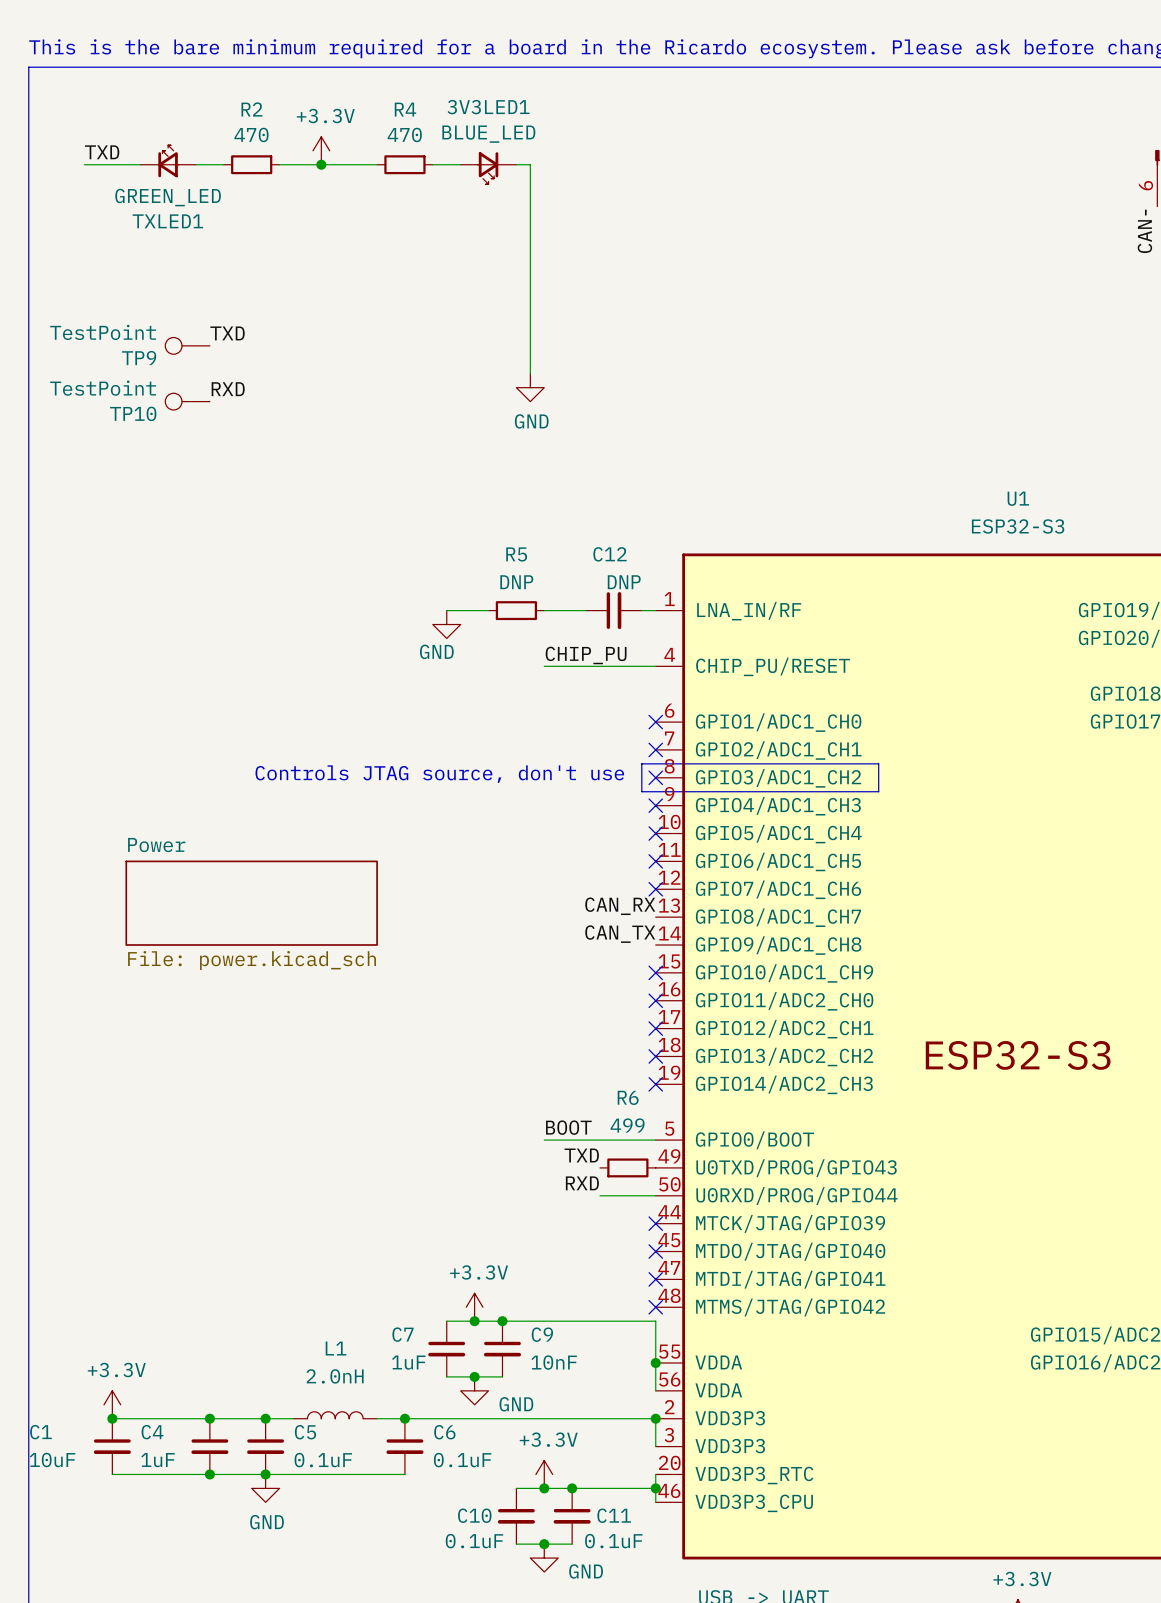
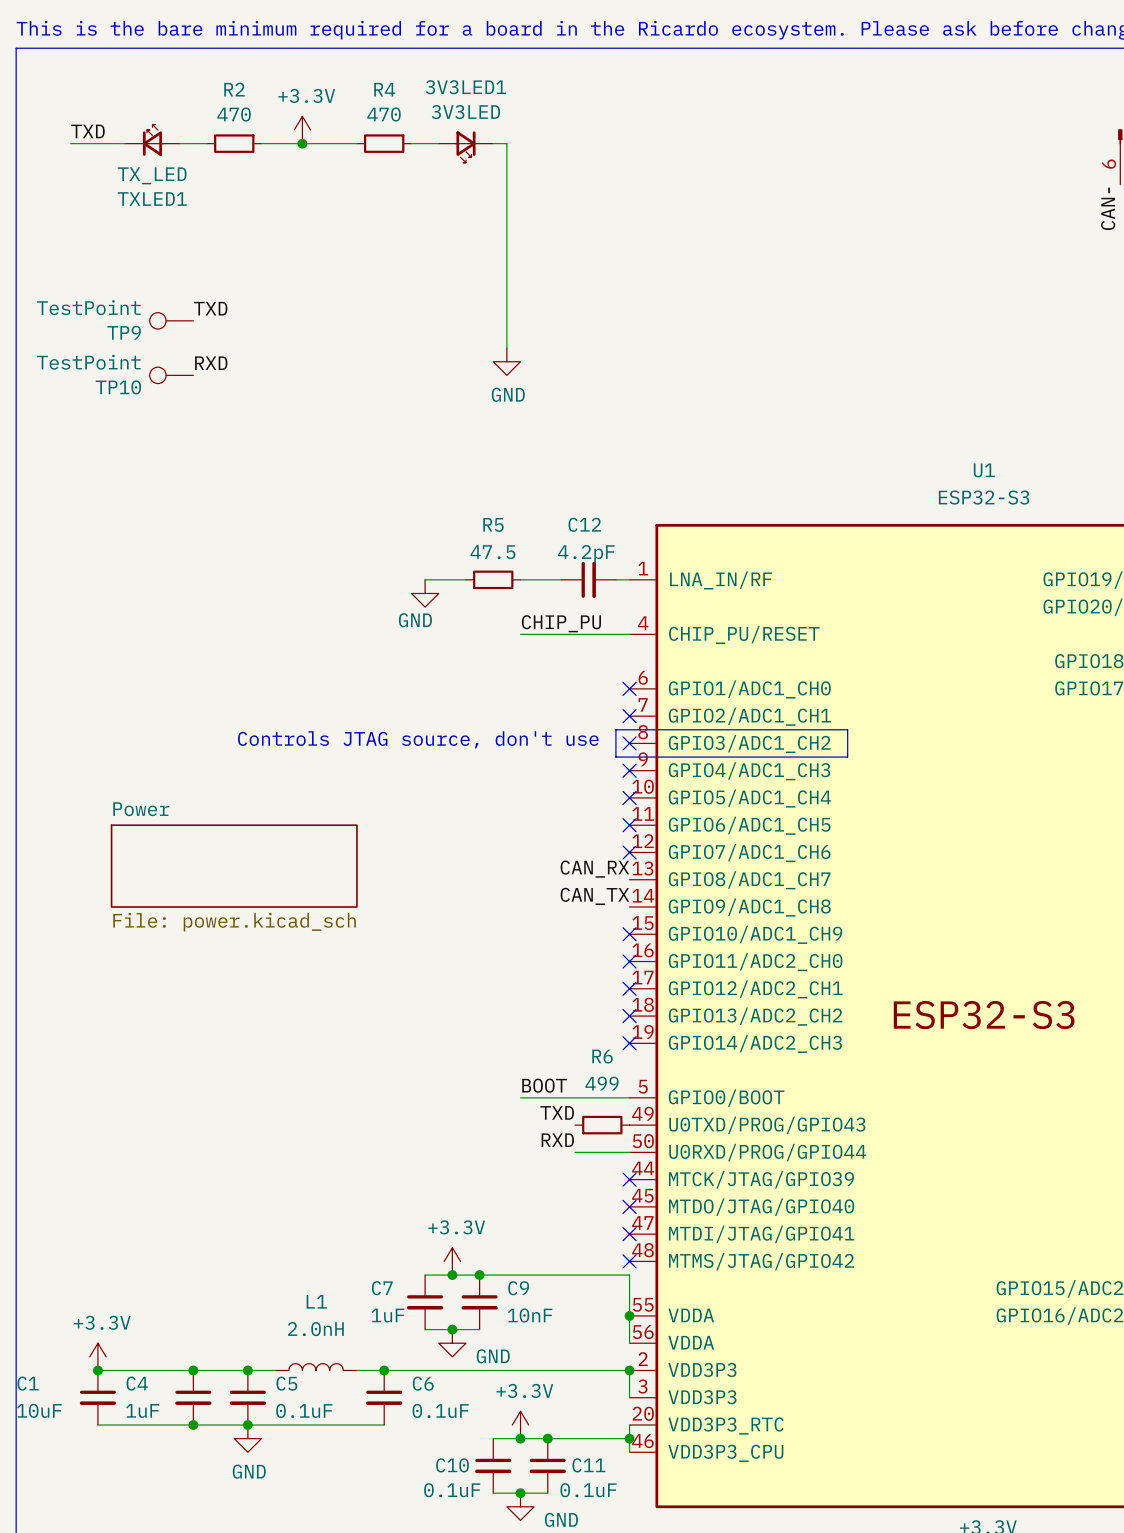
3V3LED1 value: BLUE_LED (488, 134) -> 3V3LED (465, 112)
TXLED1 value: GREEN_LED (168, 197) -> TX_LED (152, 175)
R5 value: DNP (516, 582) -> 47.5 (492, 552)
C12 value: DNP (624, 582) -> 4.2pF (586, 553)

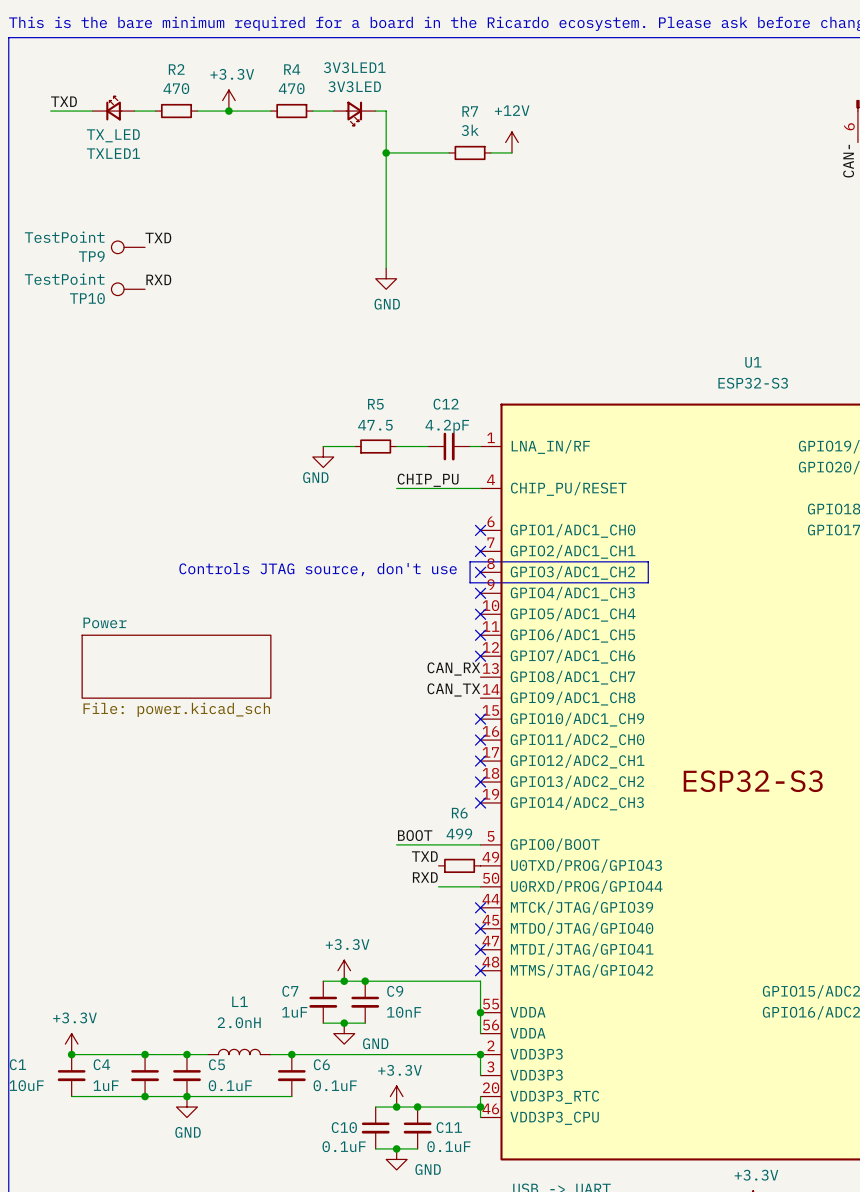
power symbol: none -> +12V (511, 142)
wire: none -> (386, 152) (449, 152)
junction: none -> (386, 152)
R7: none -> 3k (470, 152)
wire: none -> (491, 152) (511, 152)

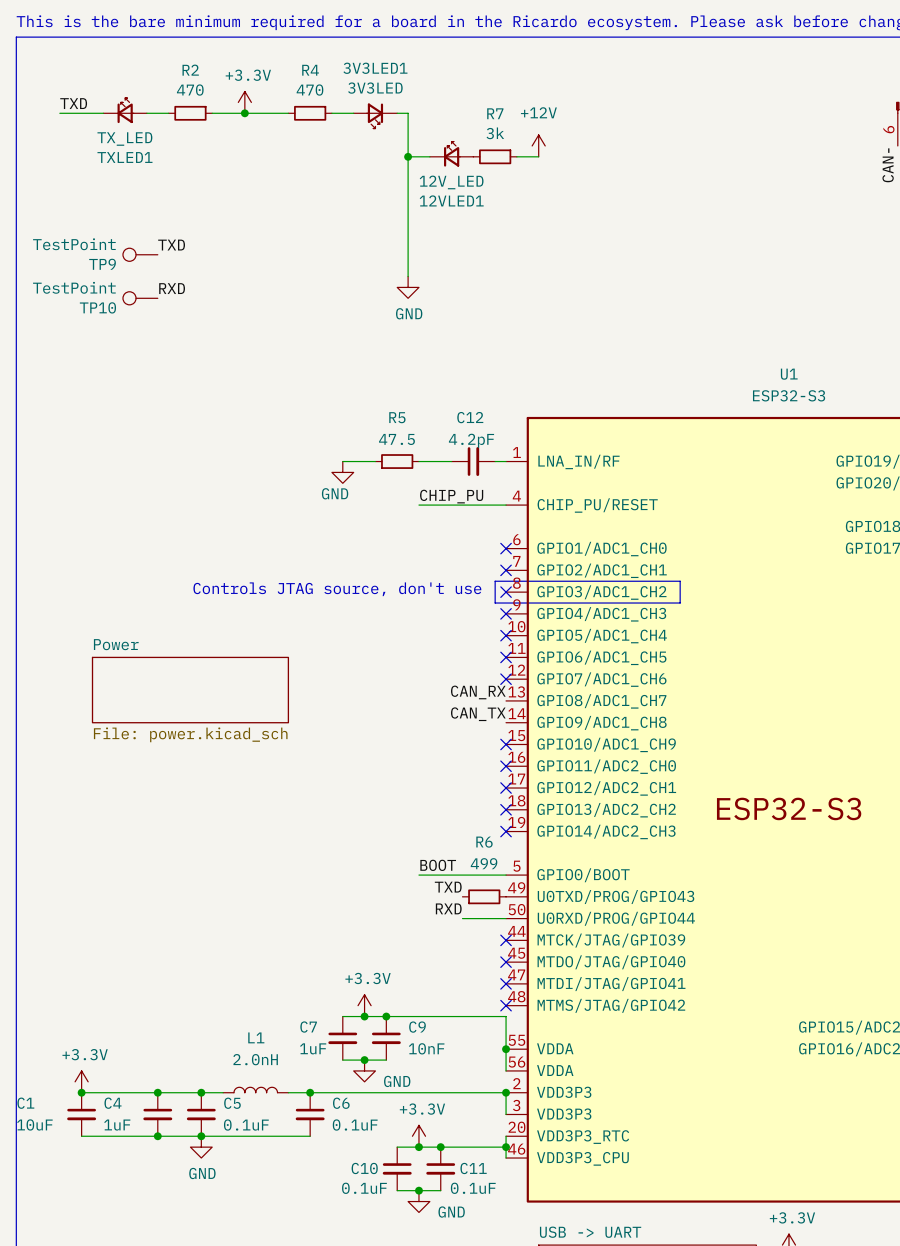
12VLED1: none -> 12V_LED (451, 154)

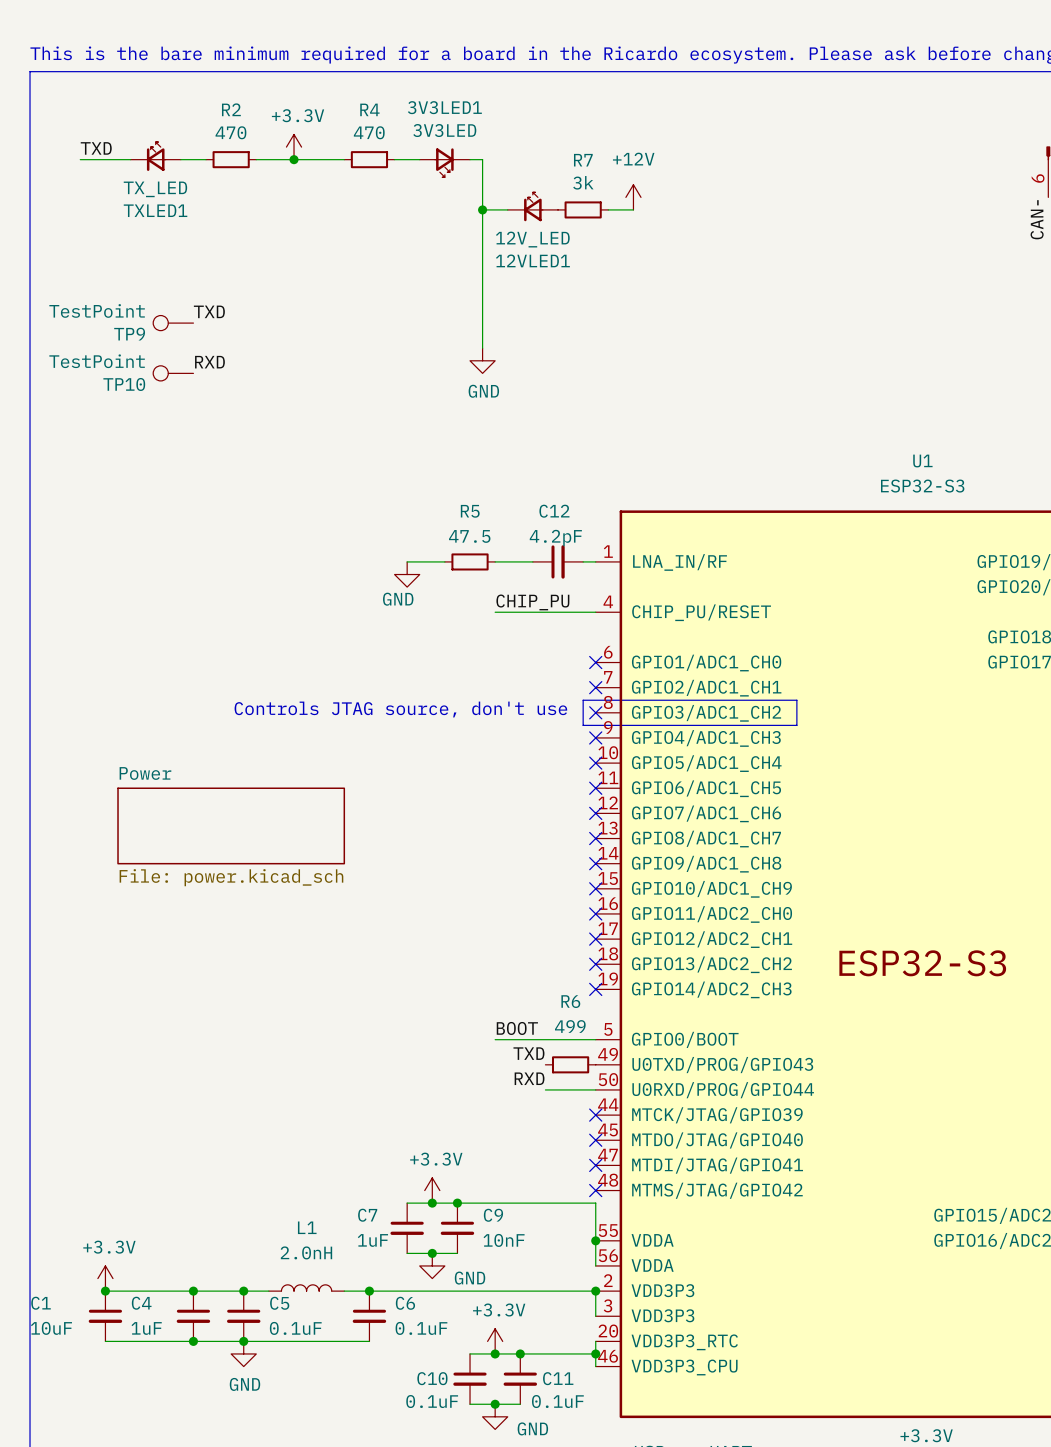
label: CAN_RX (478, 692) -> none
no-connect mark: none -> (595, 838)
label: CAN_TX (478, 714) -> none
no-connect mark: none -> (595, 863)

